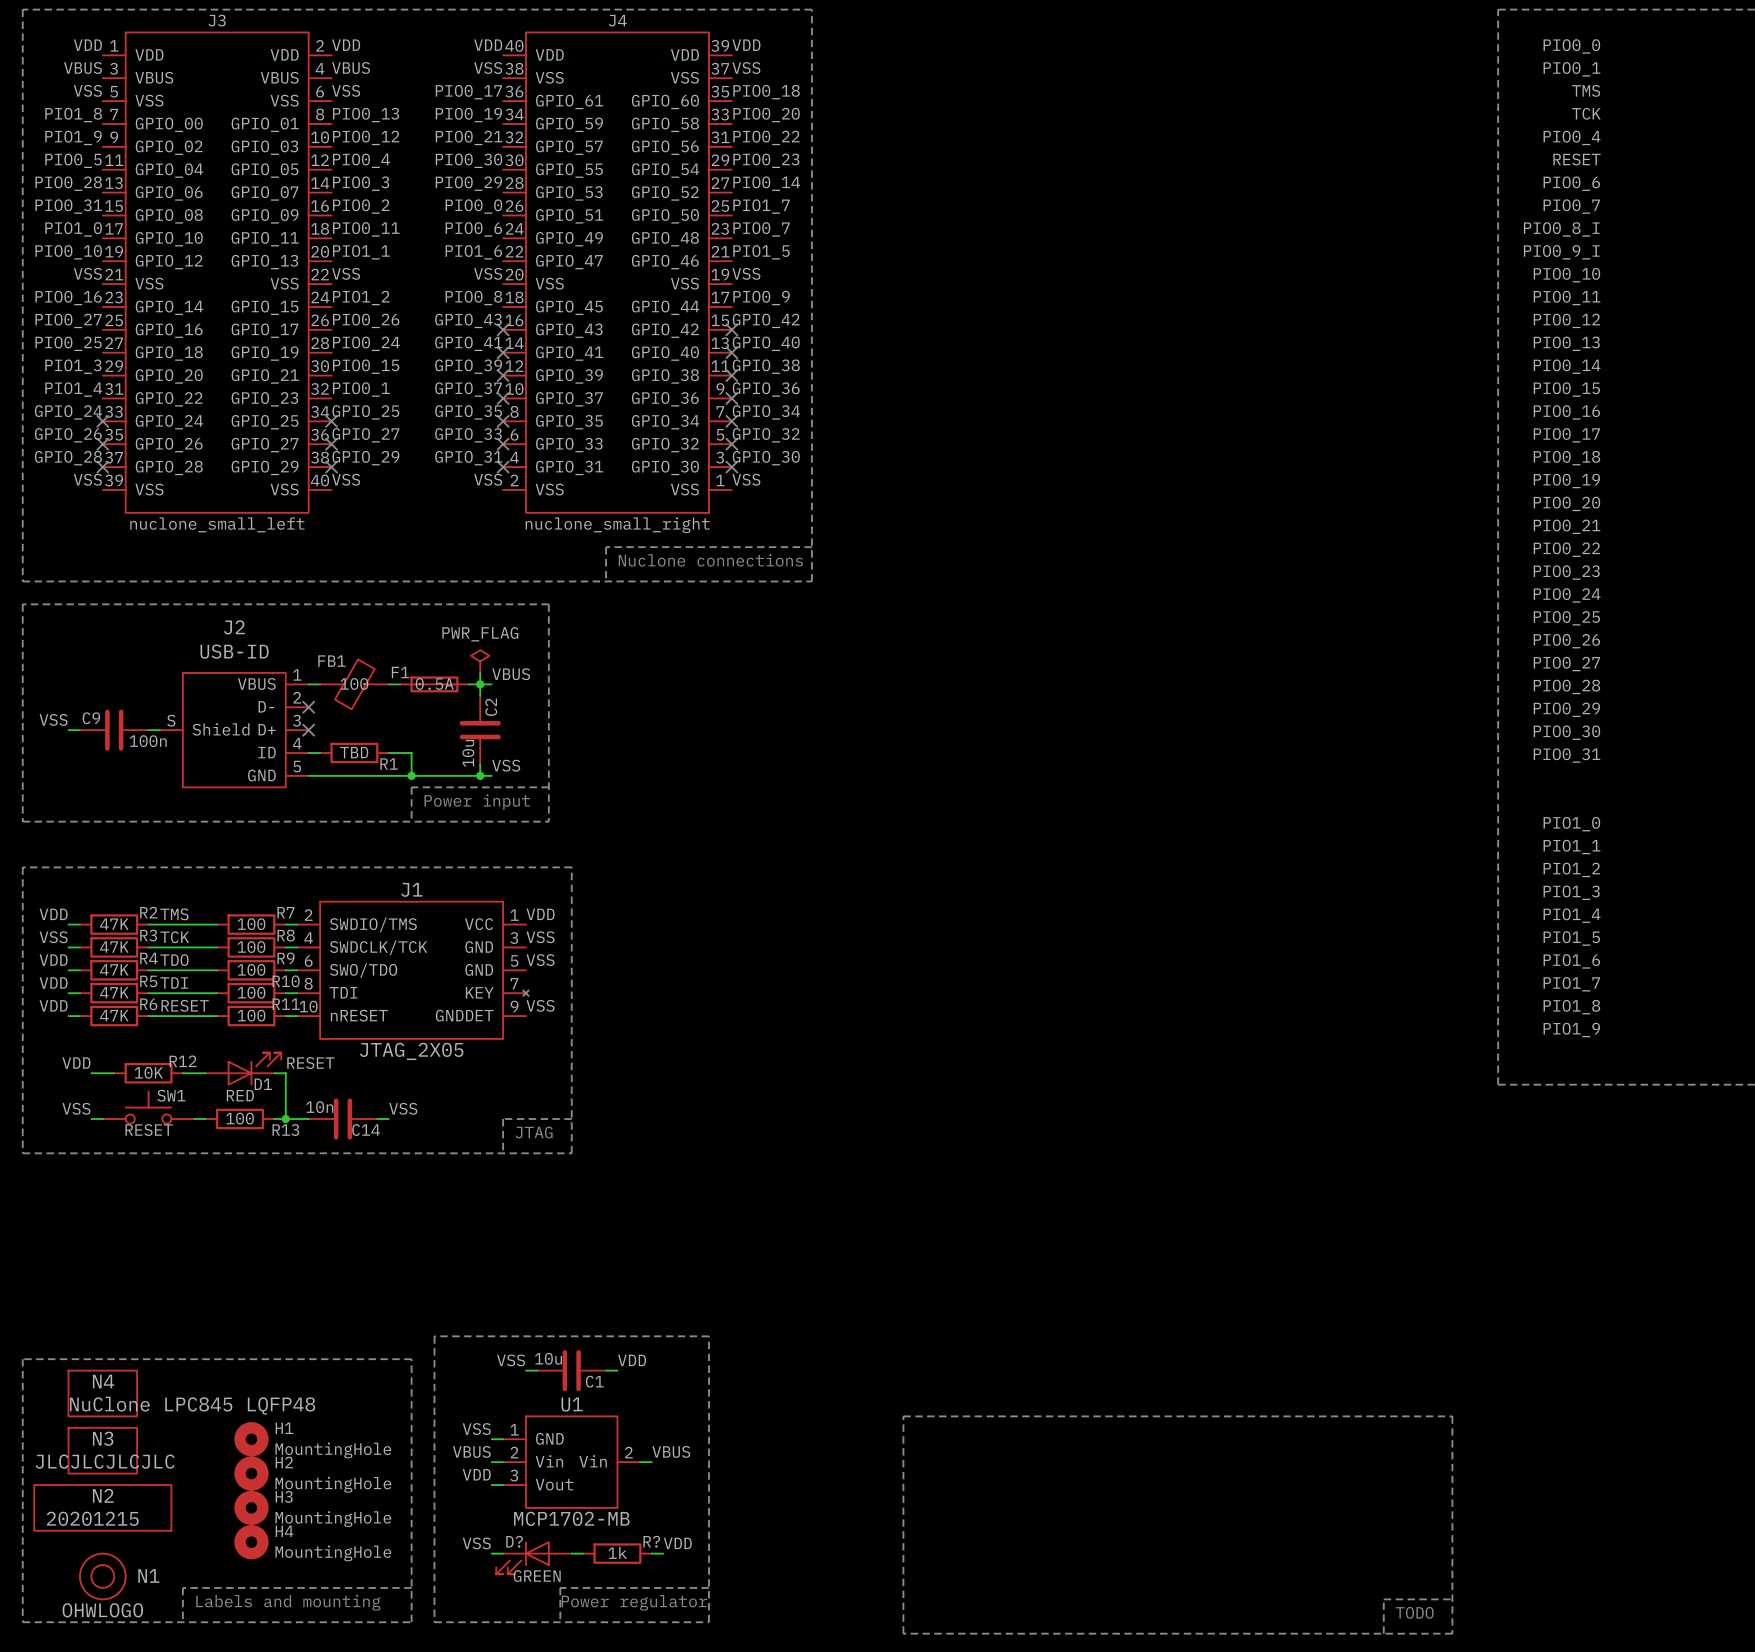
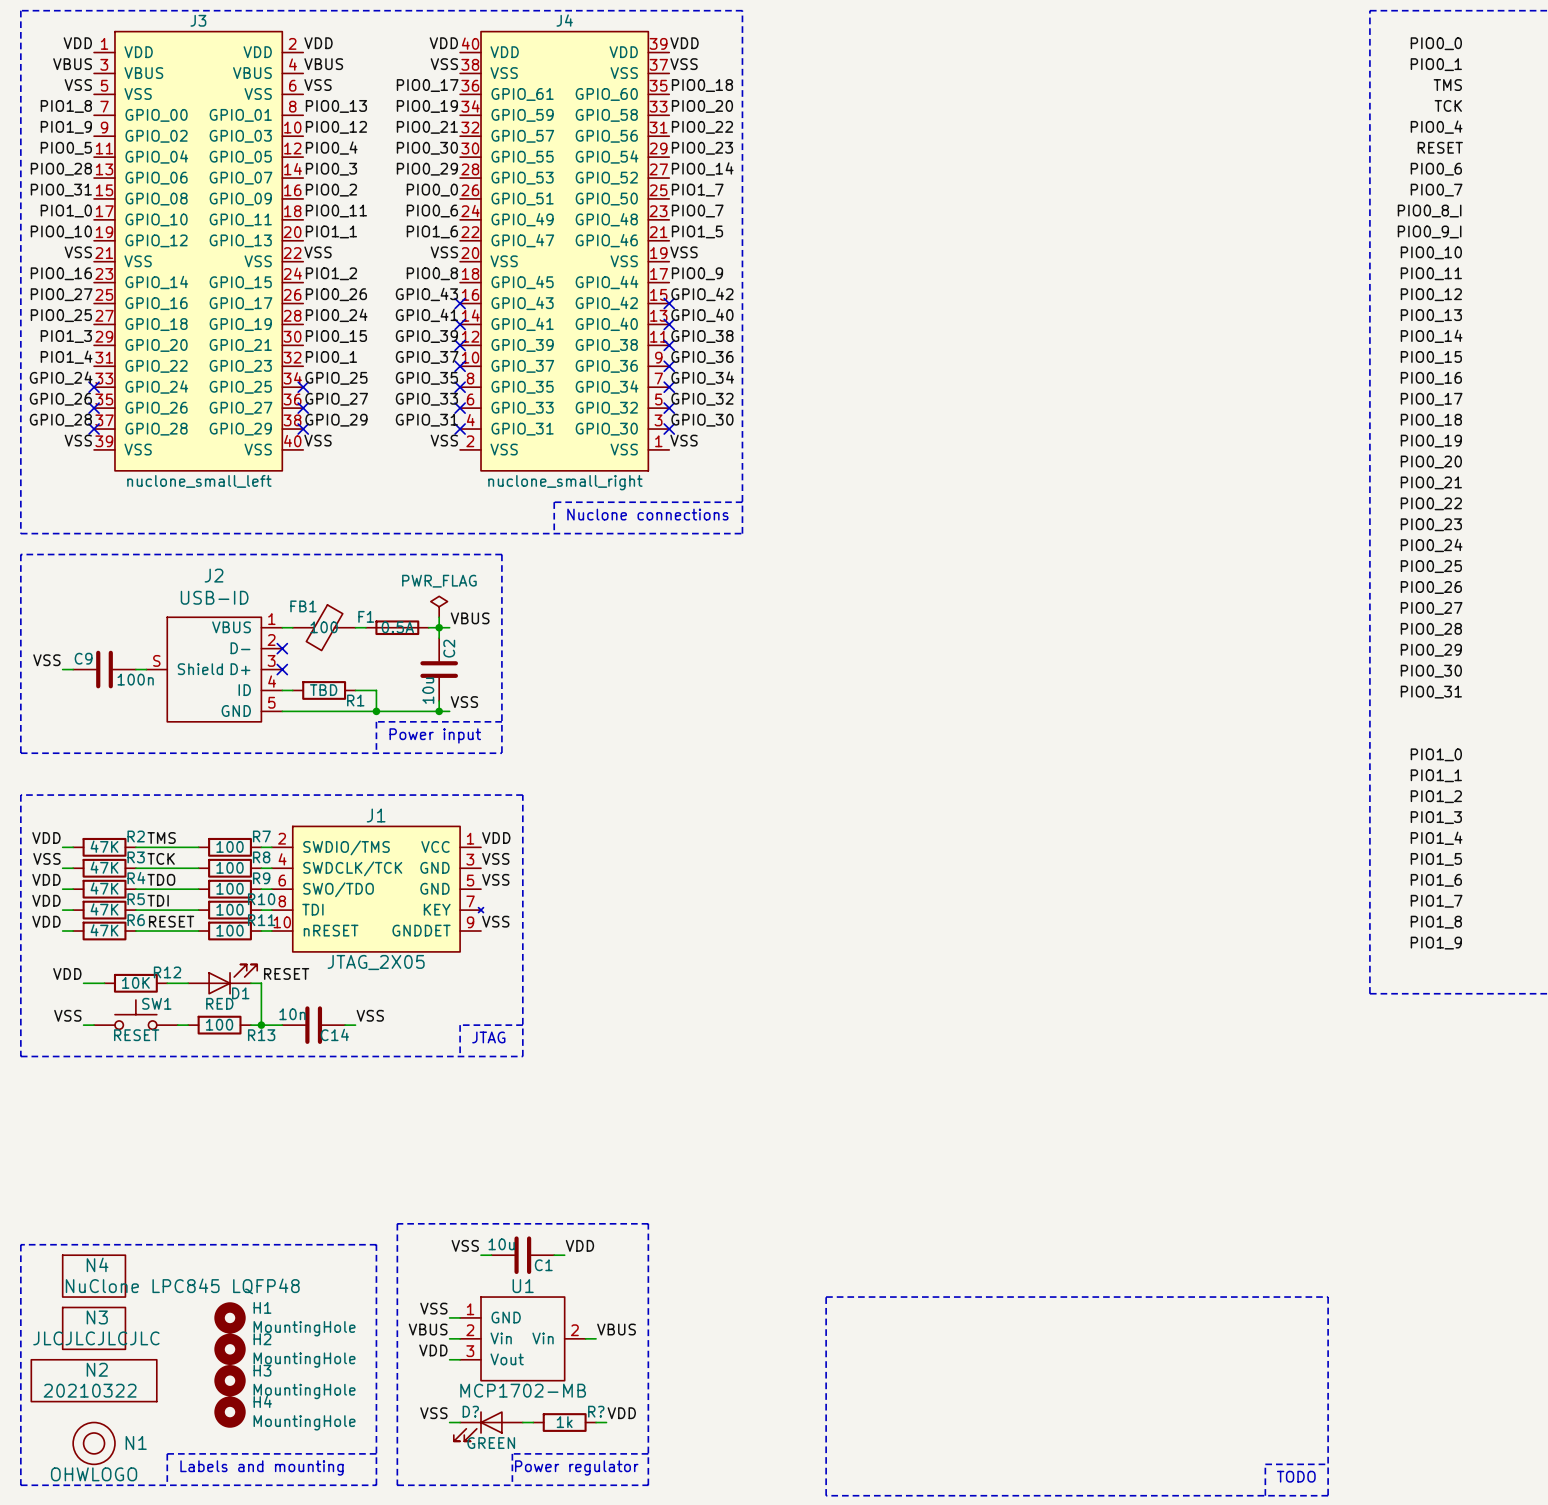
N2 value: 20201215 (92, 1518) -> 20210322 (90, 1390)

